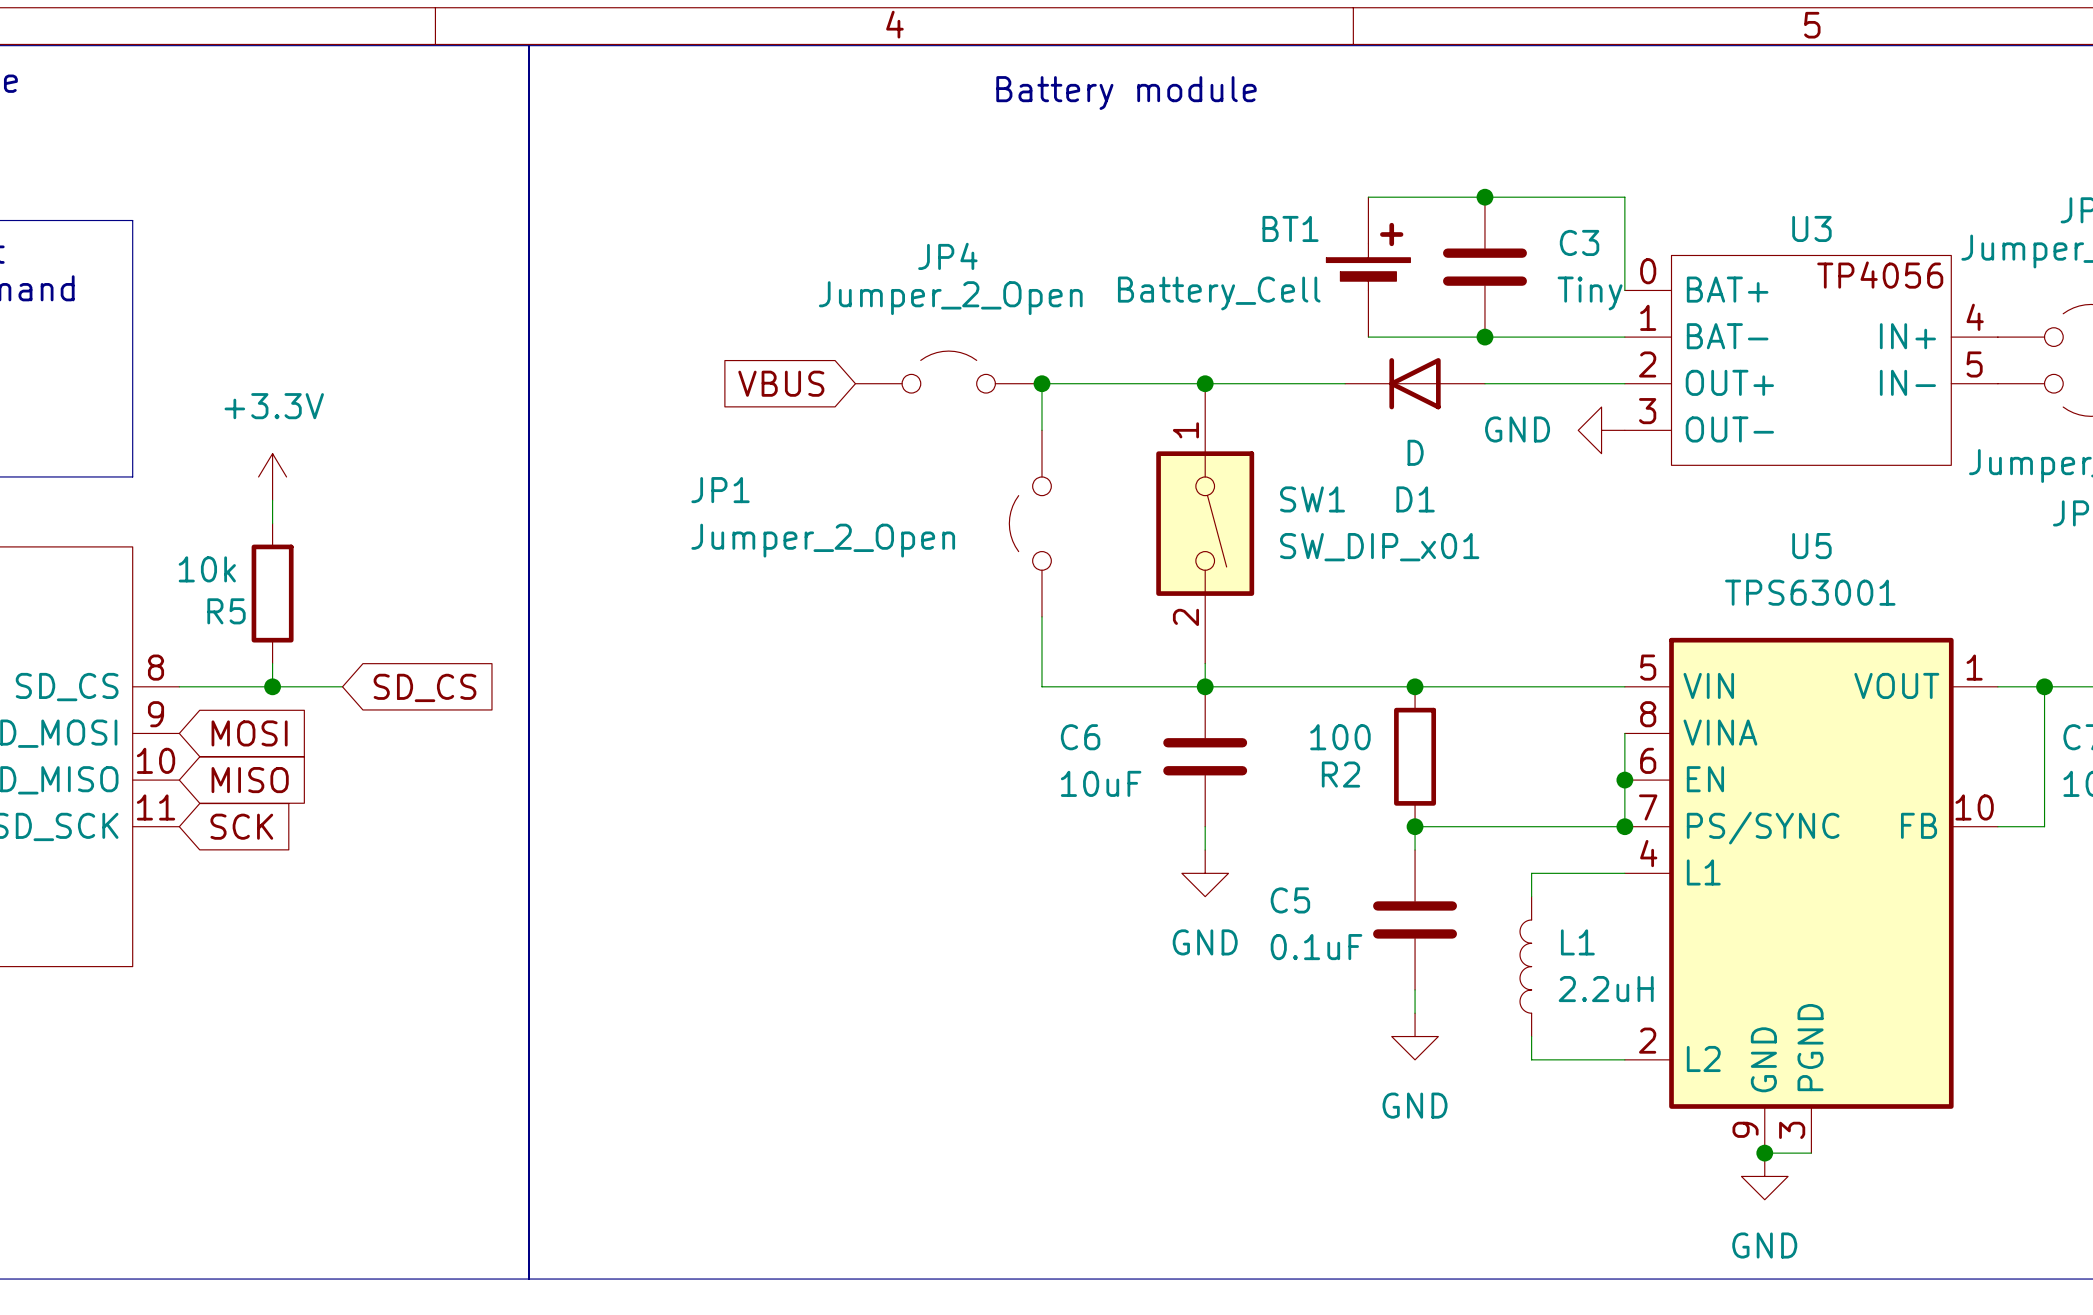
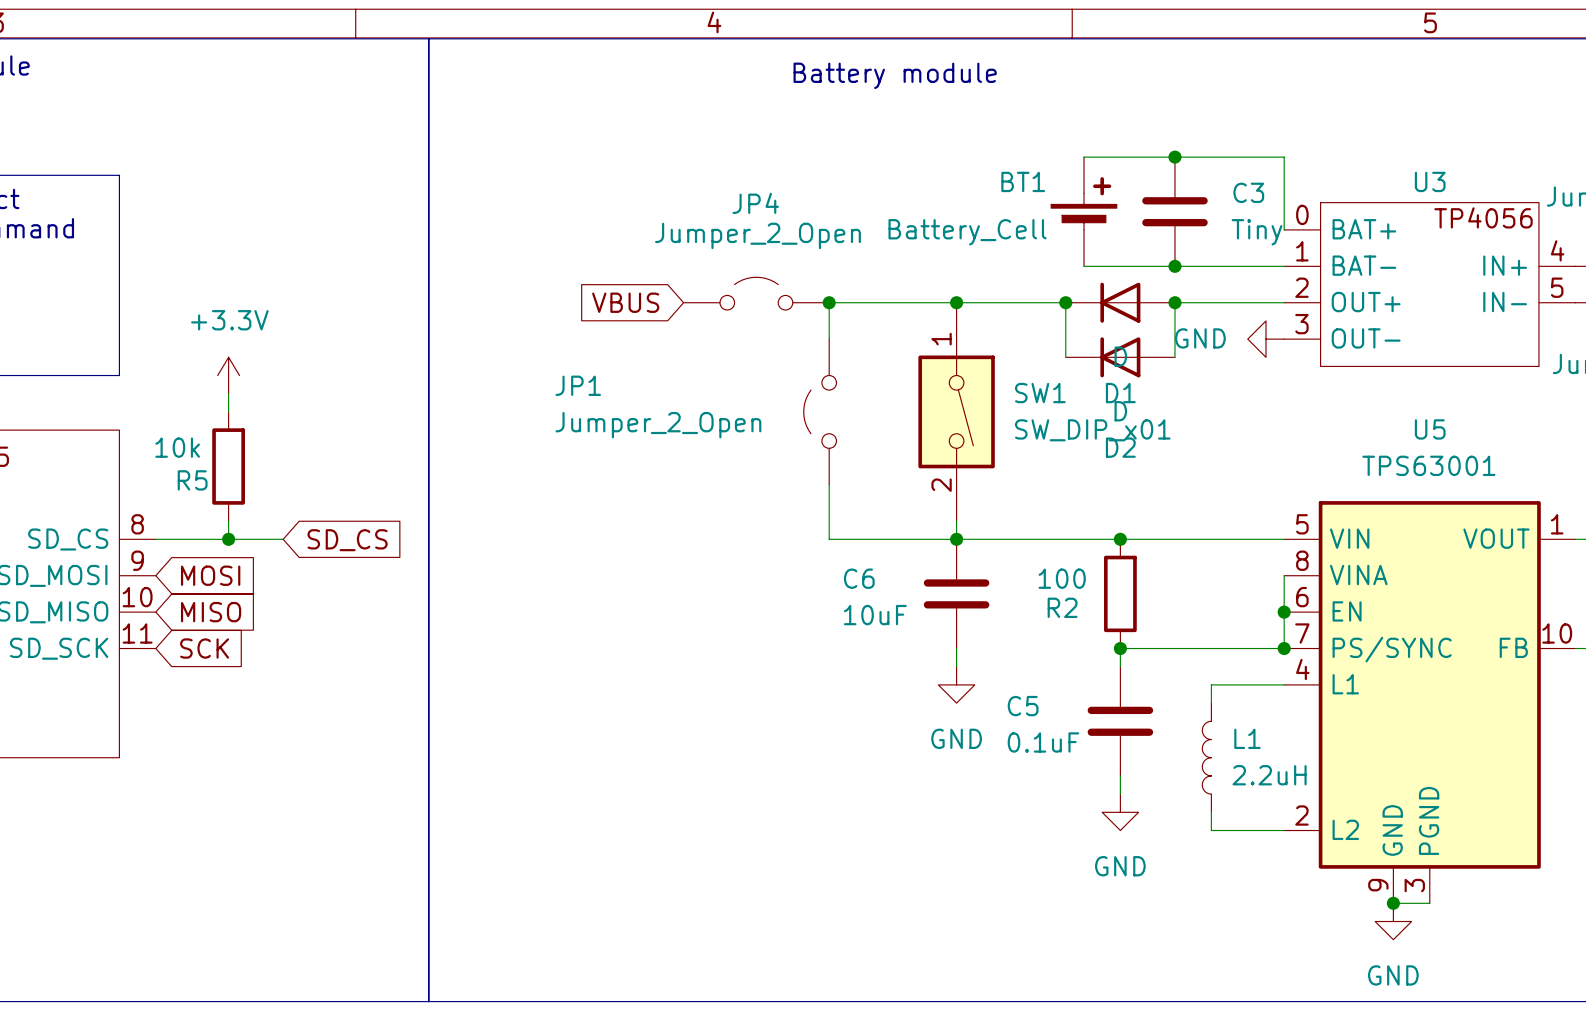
wire: none -> (1065, 302) (1065, 357)
junction: none -> (1065, 302)
wire: none -> (1174, 302) (1174, 357)
junction: none -> (1174, 302)
D2: none -> D (1120, 357)

